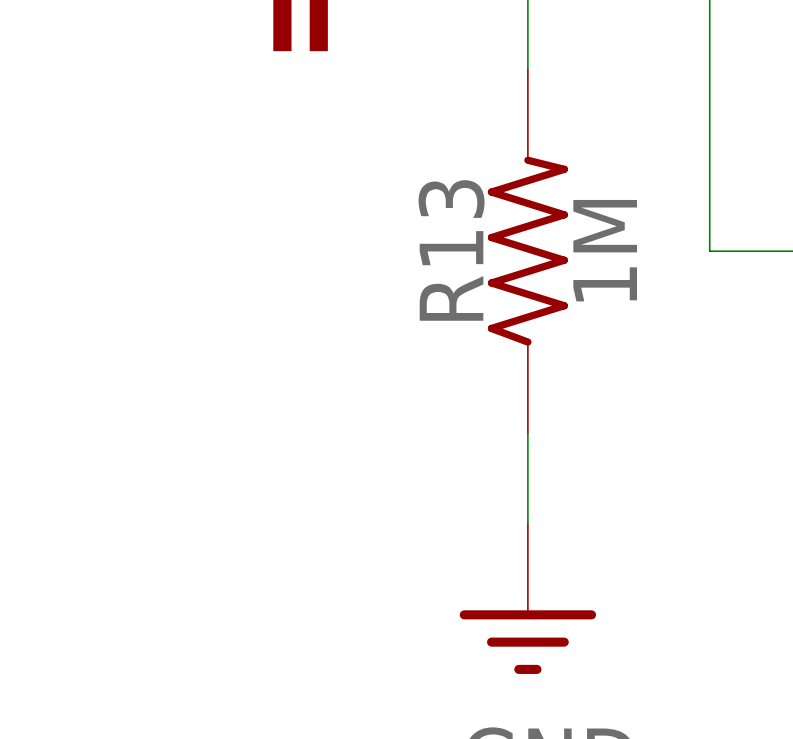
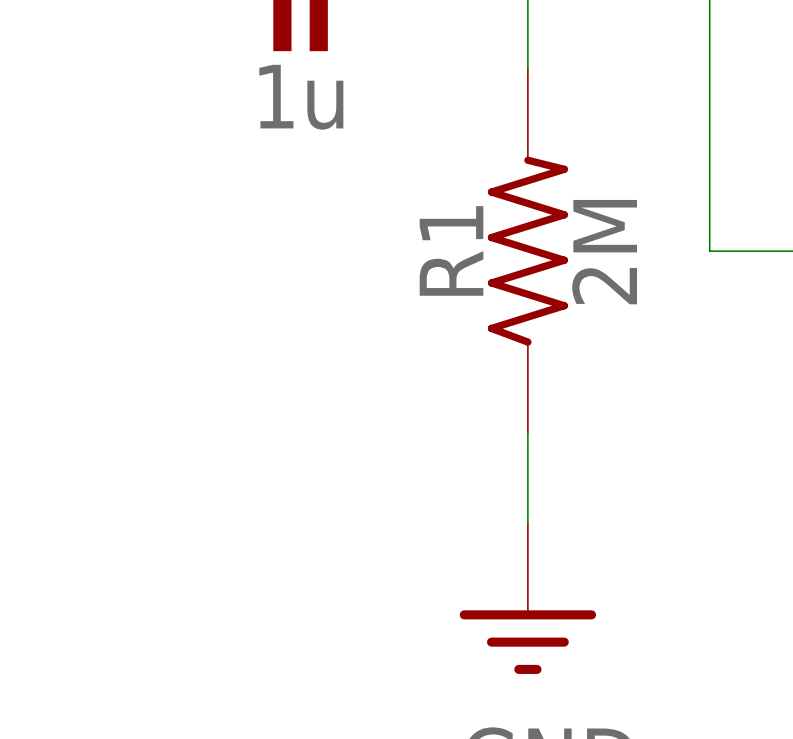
part value: none -> 1u (301, 97)
R13 name: R13 (451, 250) -> R1 (451, 250)
R13 value: 1M (605, 250) -> 2M (604, 252)

